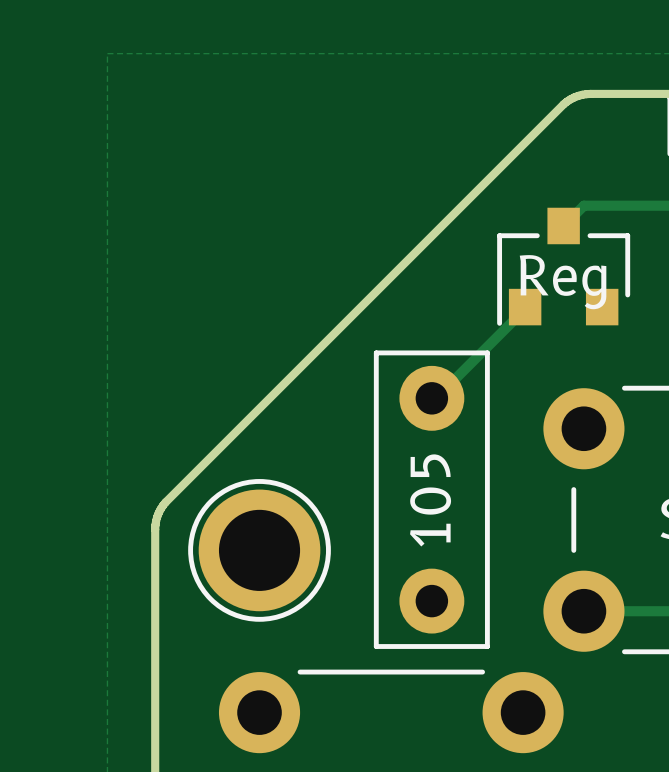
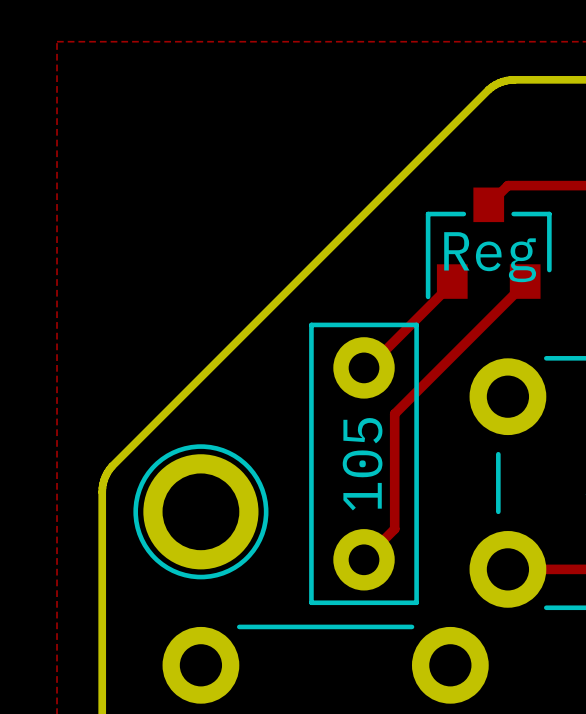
track: none -> (525, 281) (394, 413) (394, 529) (364, 559)

